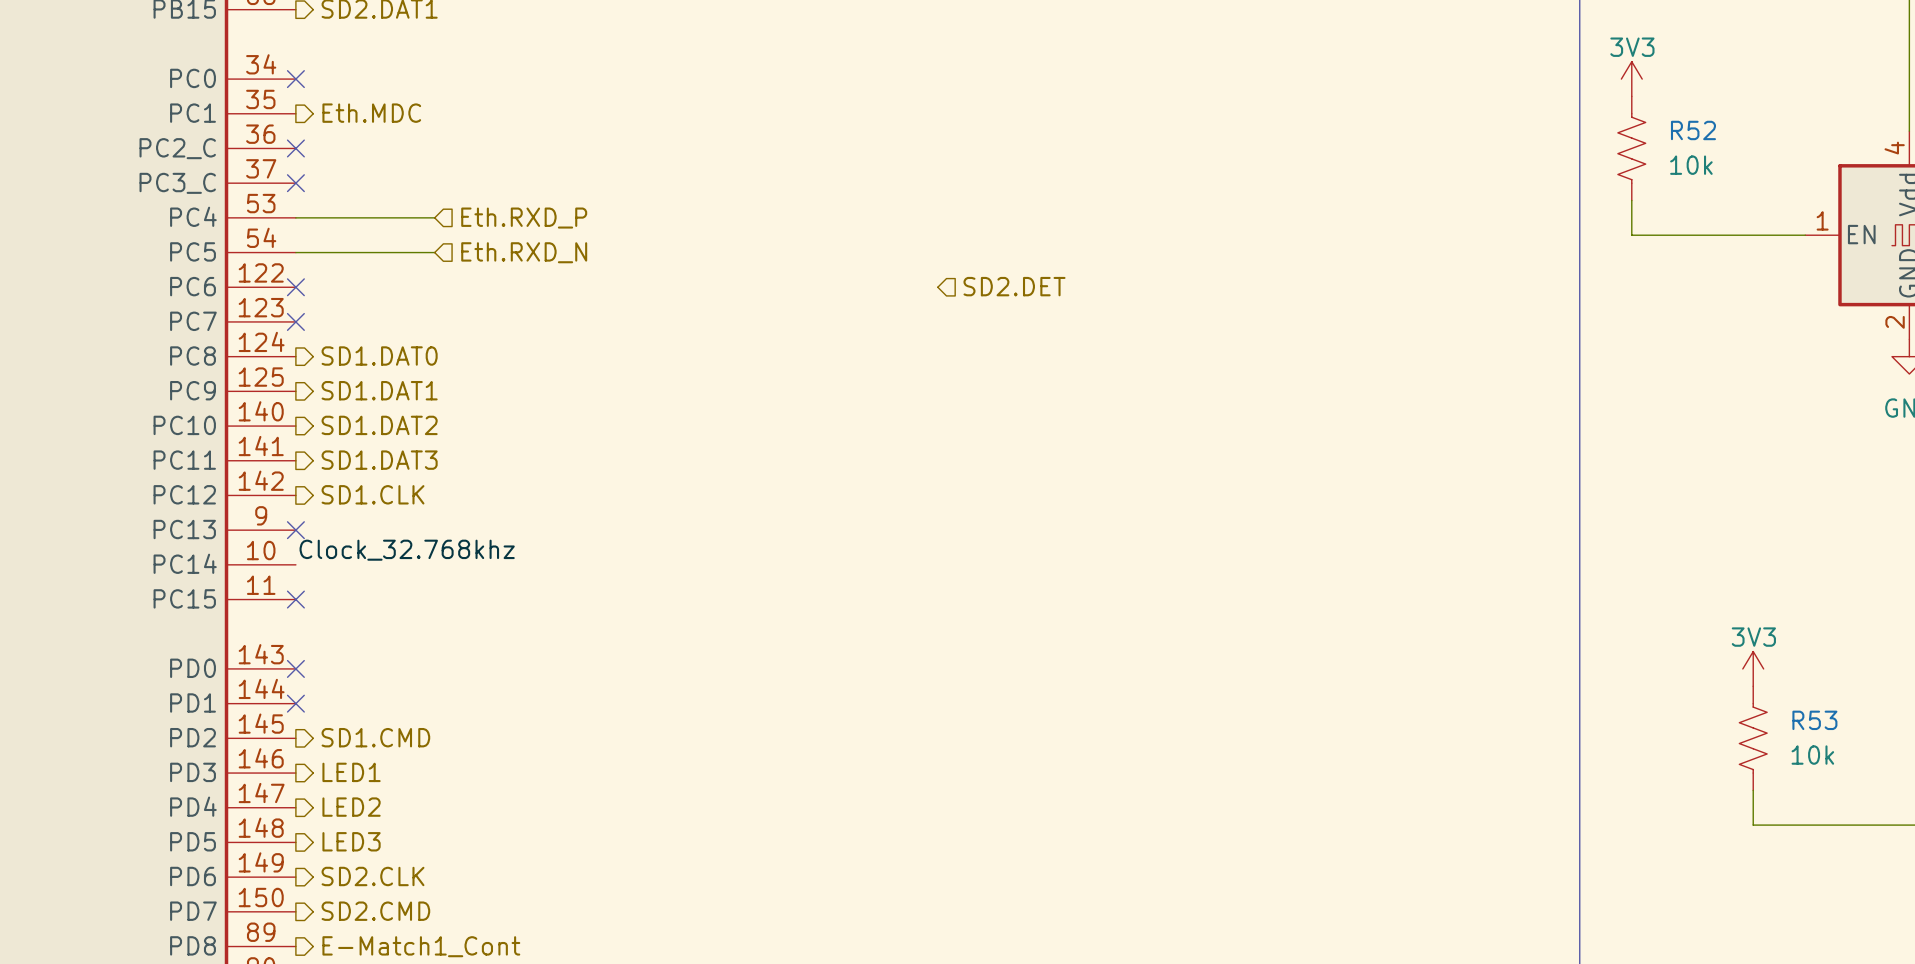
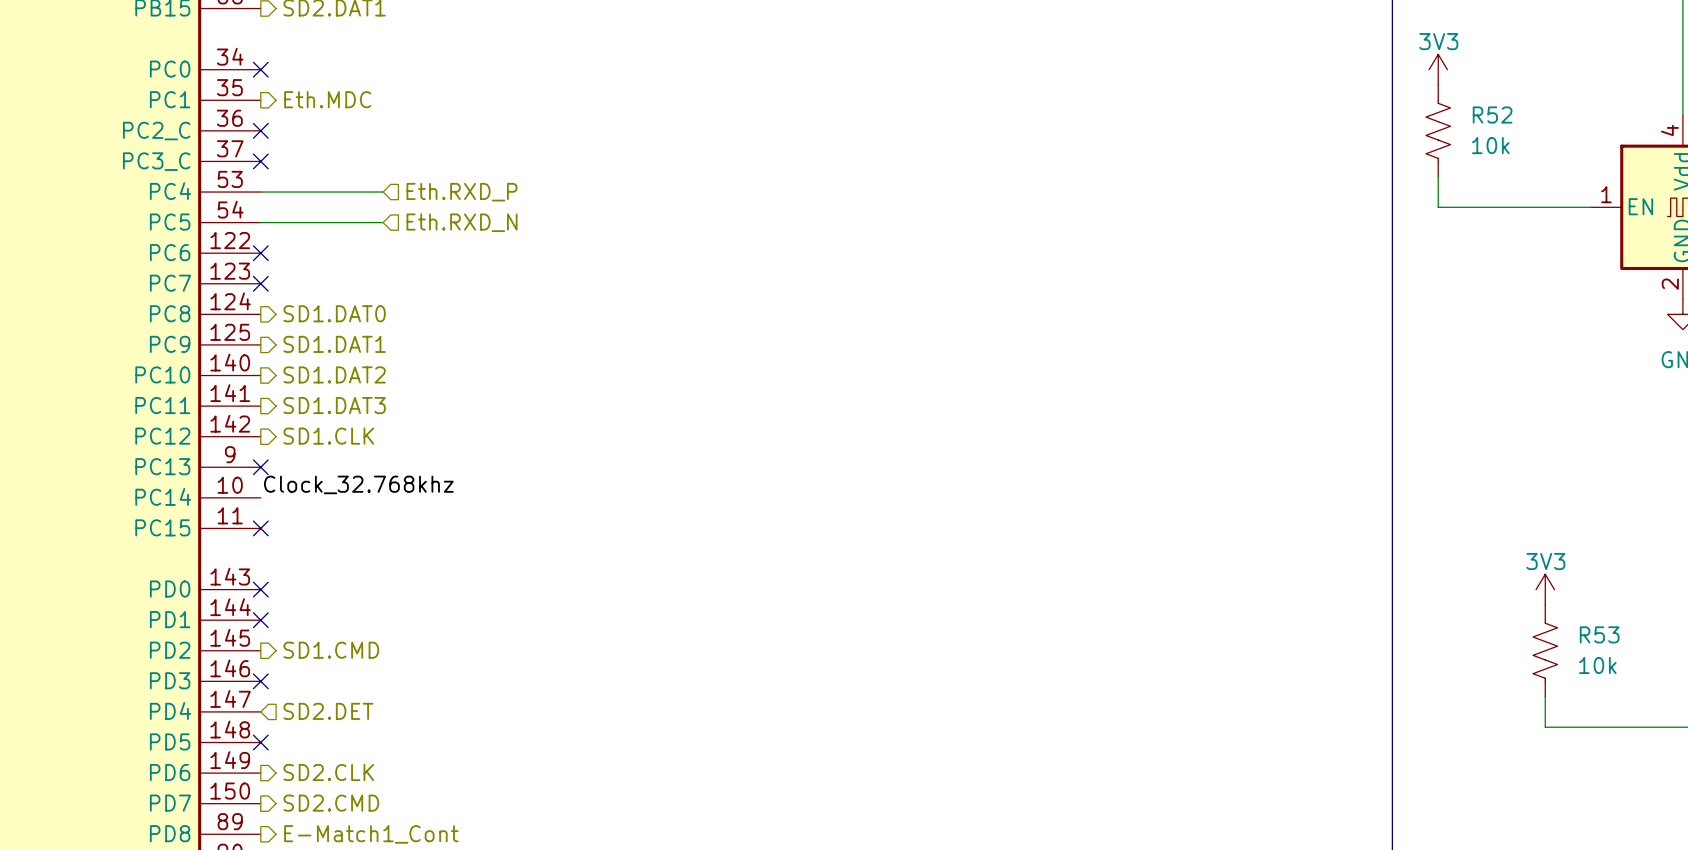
hierarchical label: SD2.DET (1014, 286) -> none
hierarchical label: LED1 (351, 772) -> none
no-connect mark: none -> (260, 681)
hierarchical label shape: output (351, 807) -> input (328, 711)
hierarchical label: LED2 (351, 807) -> SD2.DET (328, 711)
hierarchical label: LED3 (351, 841) -> none
no-connect mark: none -> (260, 742)

